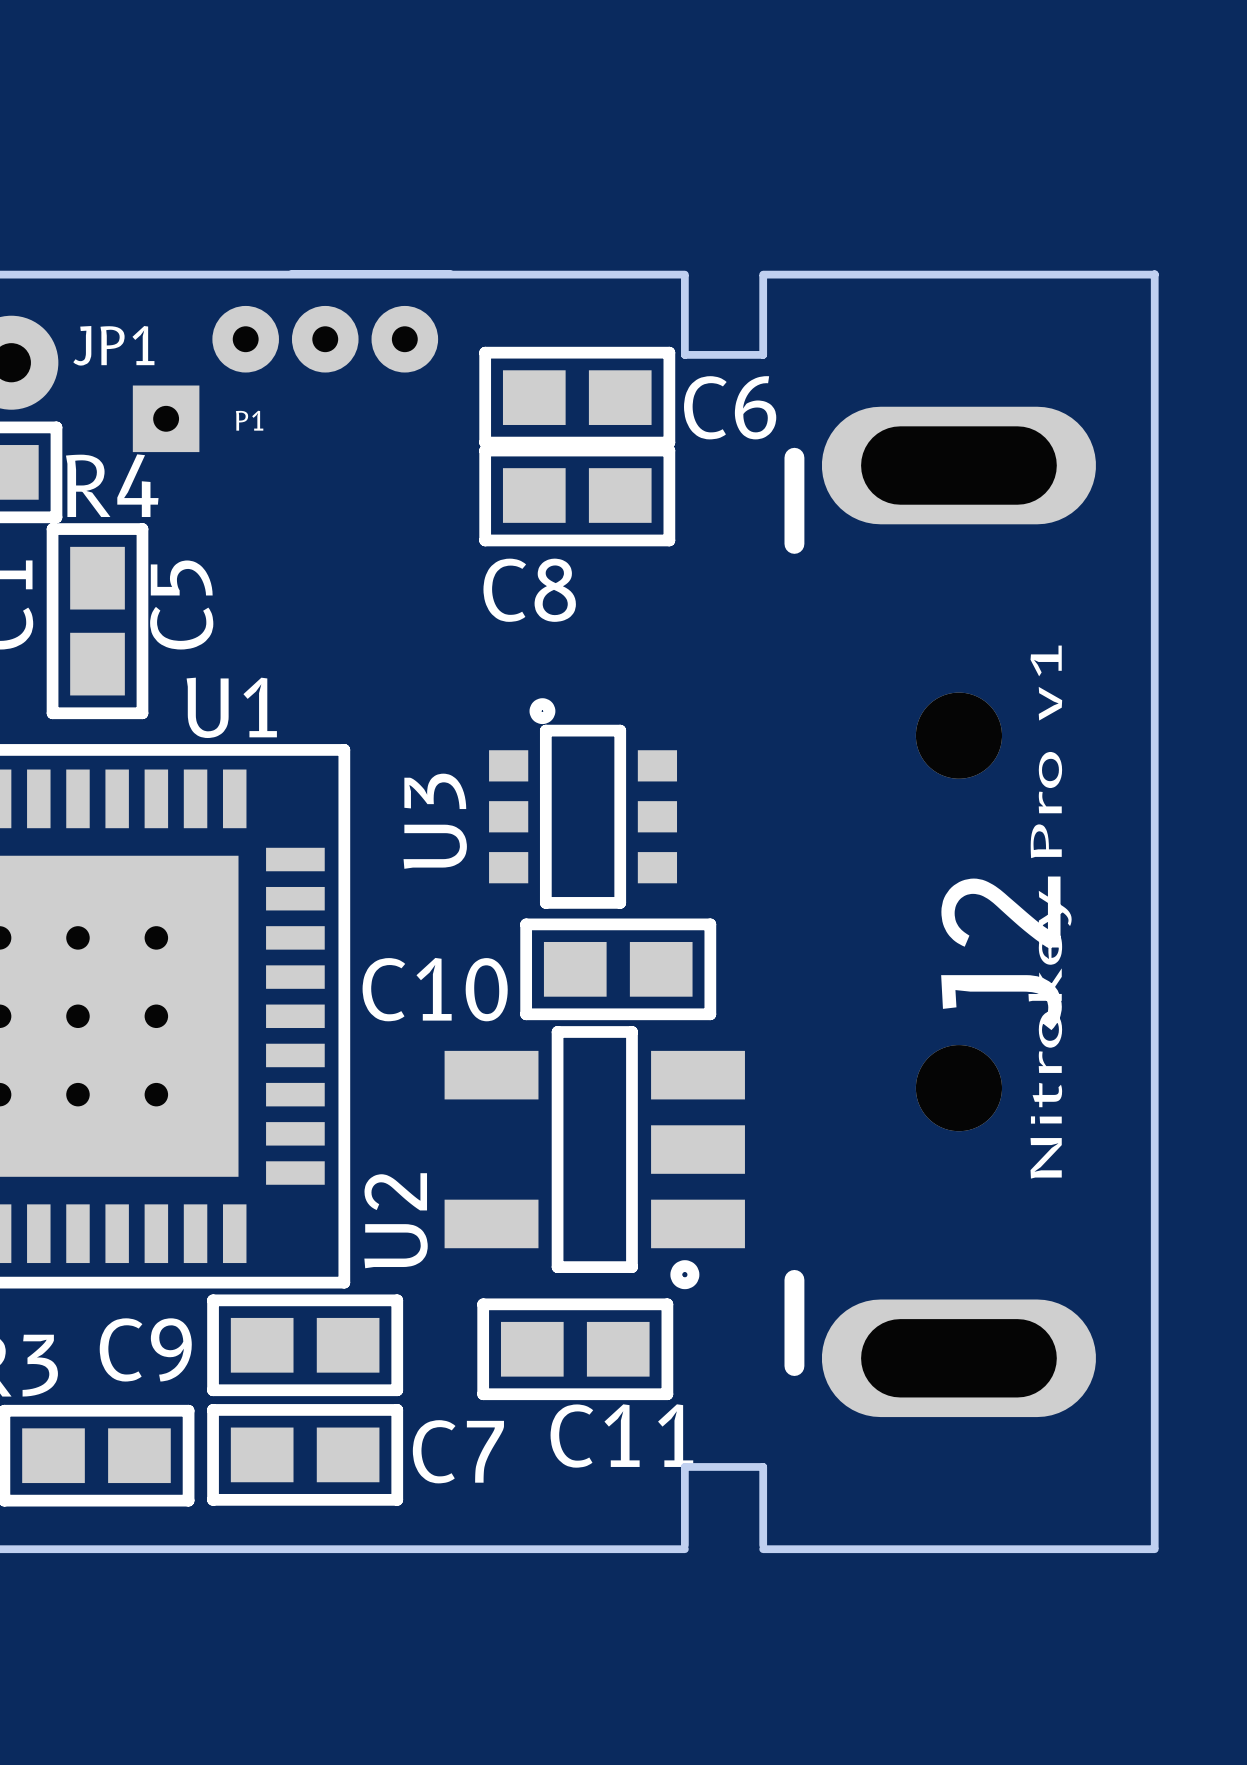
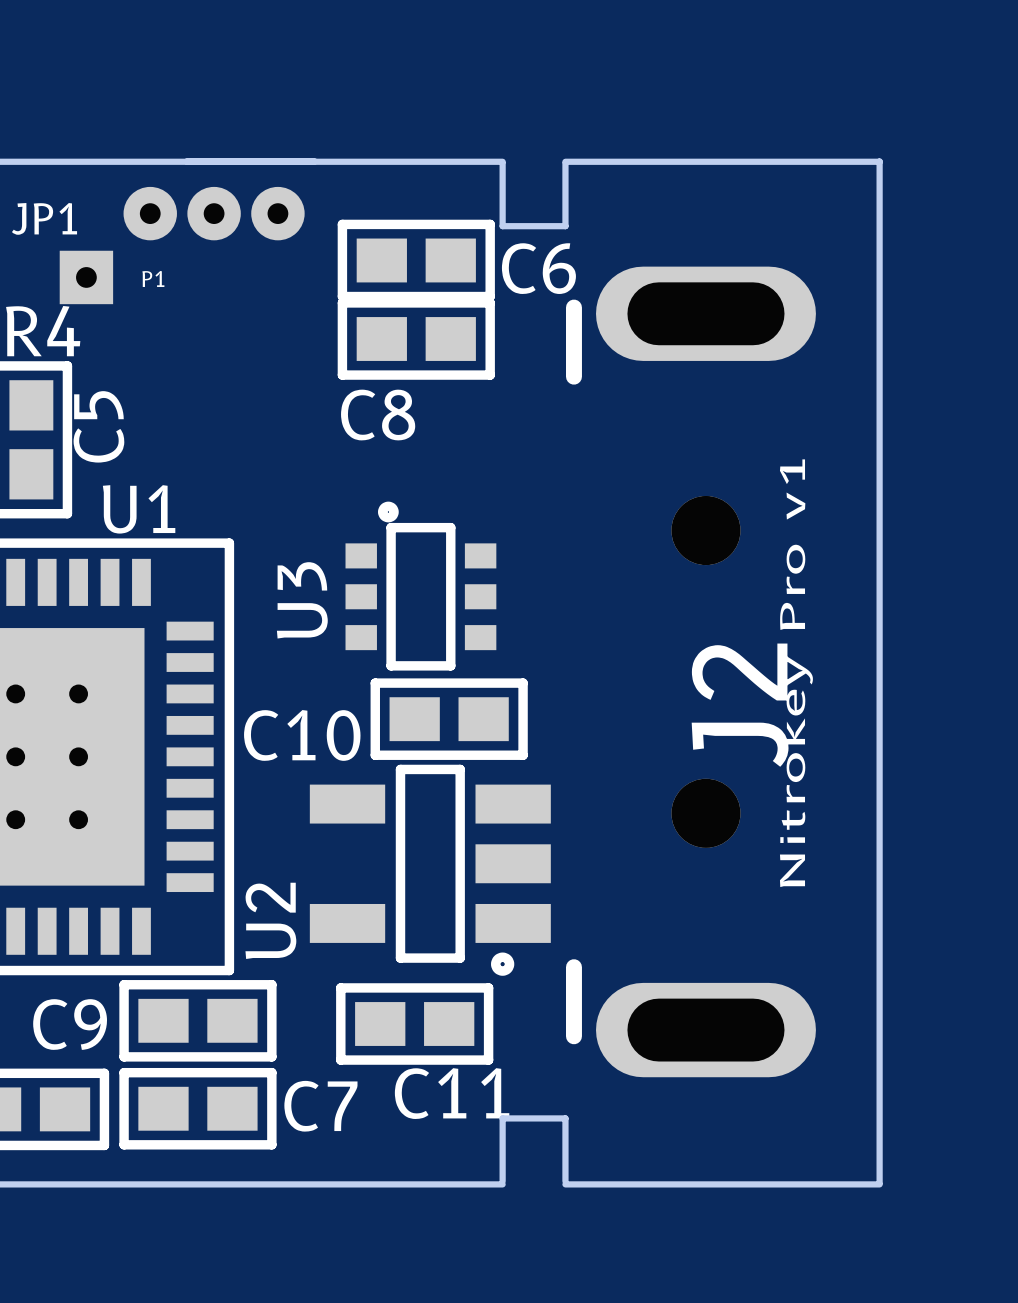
J2 position: (940, 911) -> (690, 671)

